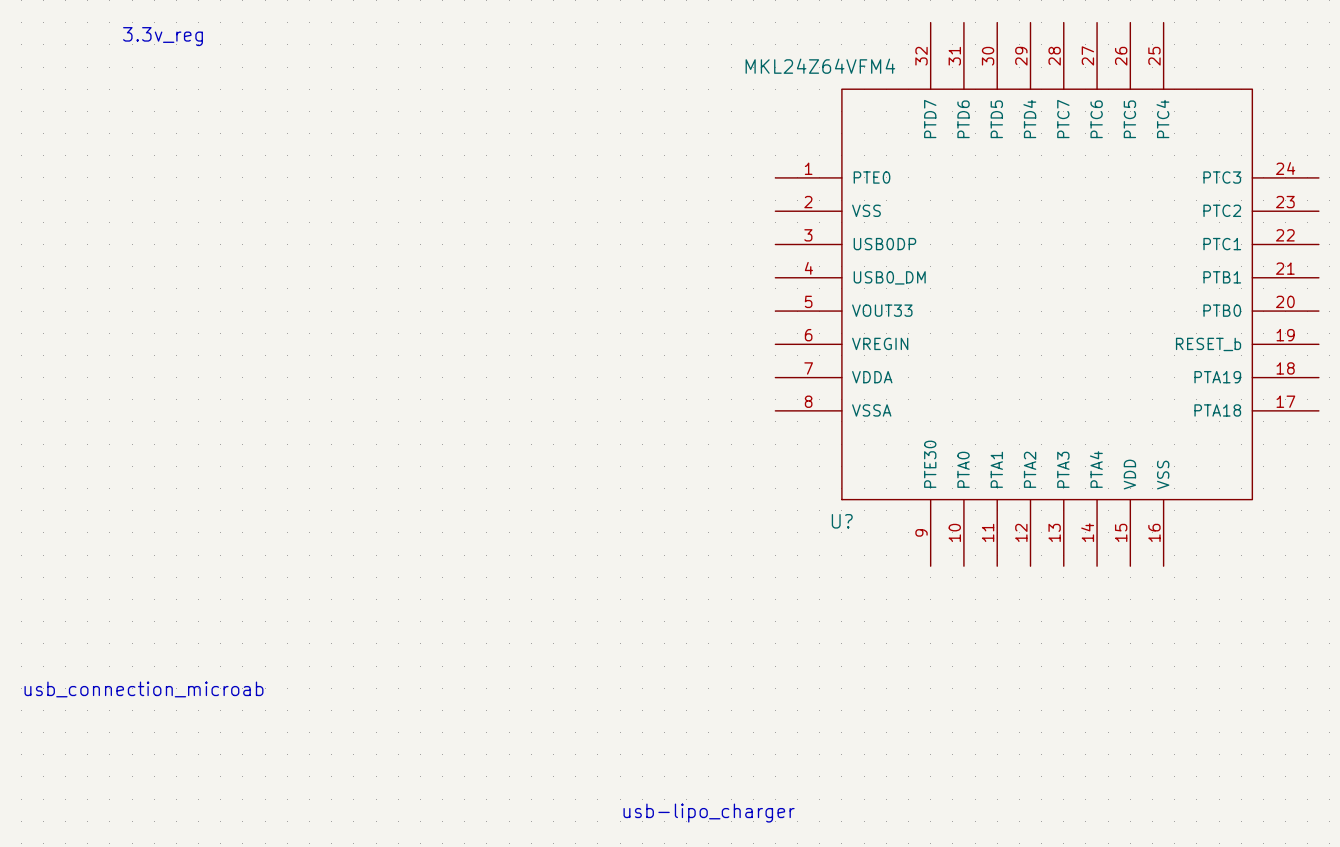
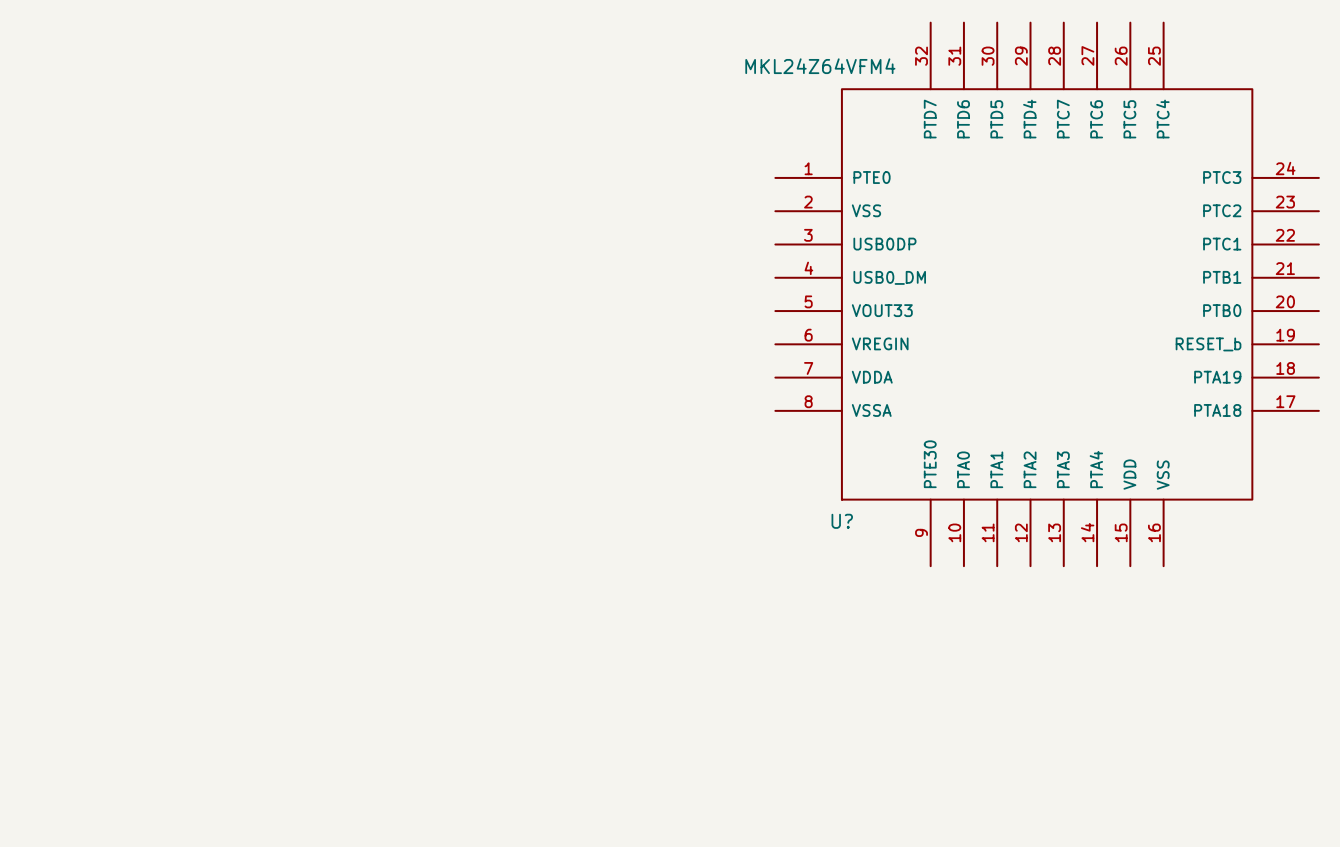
text: 3.3v_reg (162, 36) -> none
text: usb_connection_microab (143, 689) -> none
text: usb-lipo_charger (709, 813) -> none

